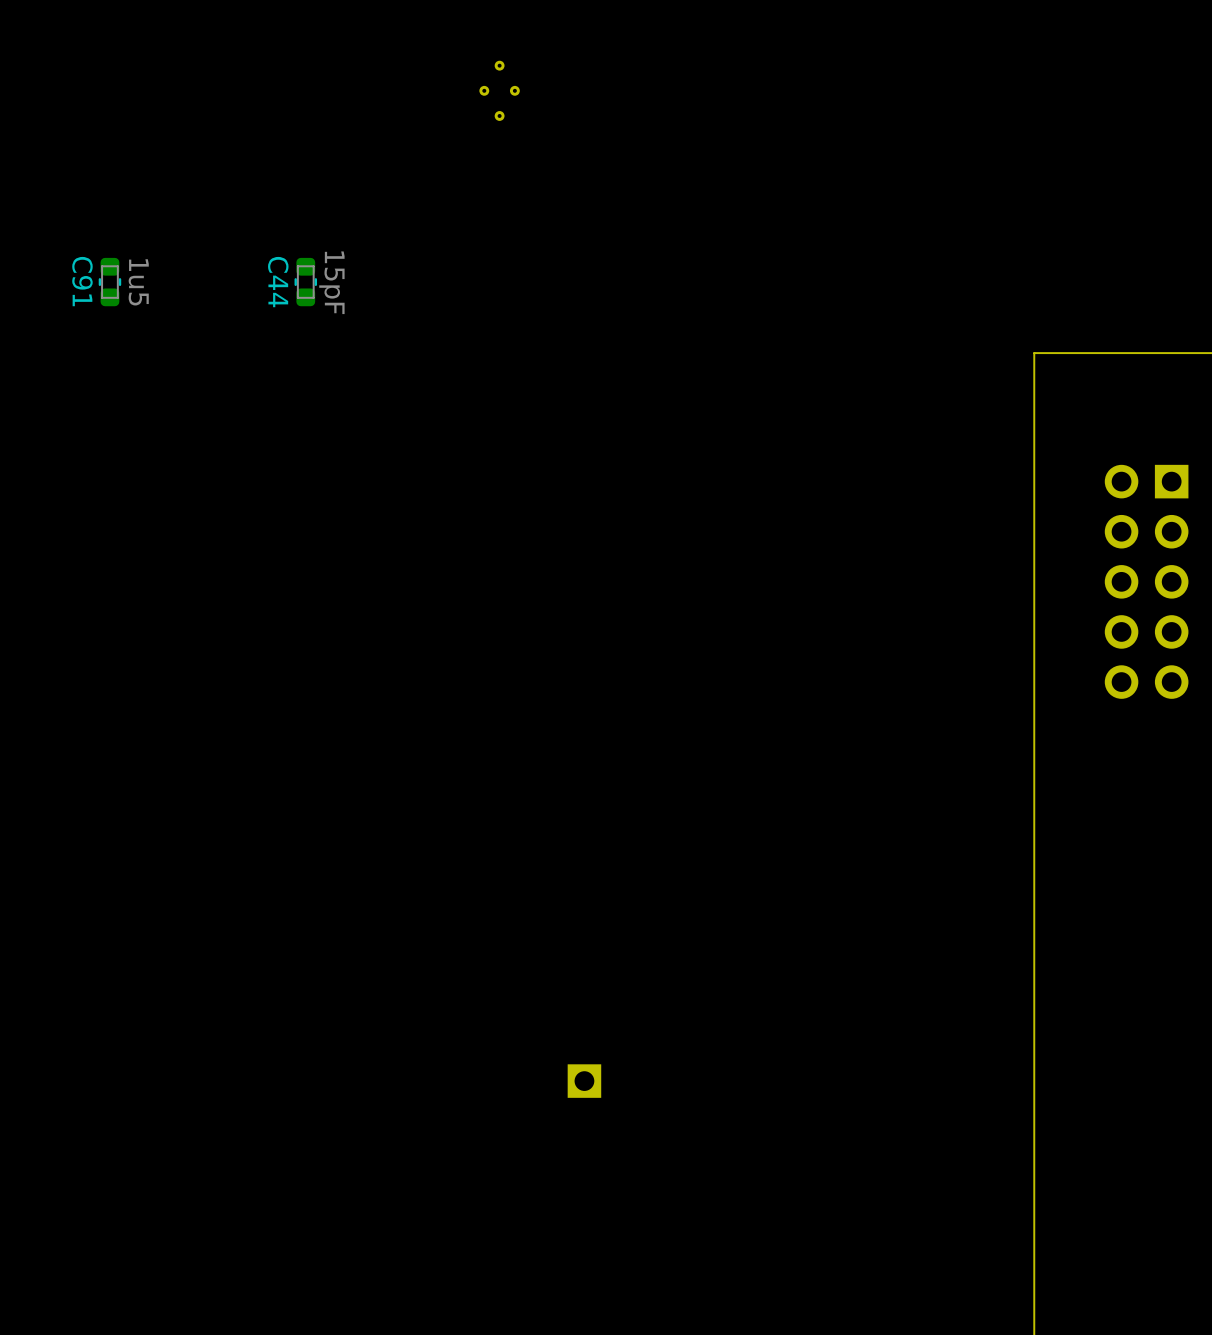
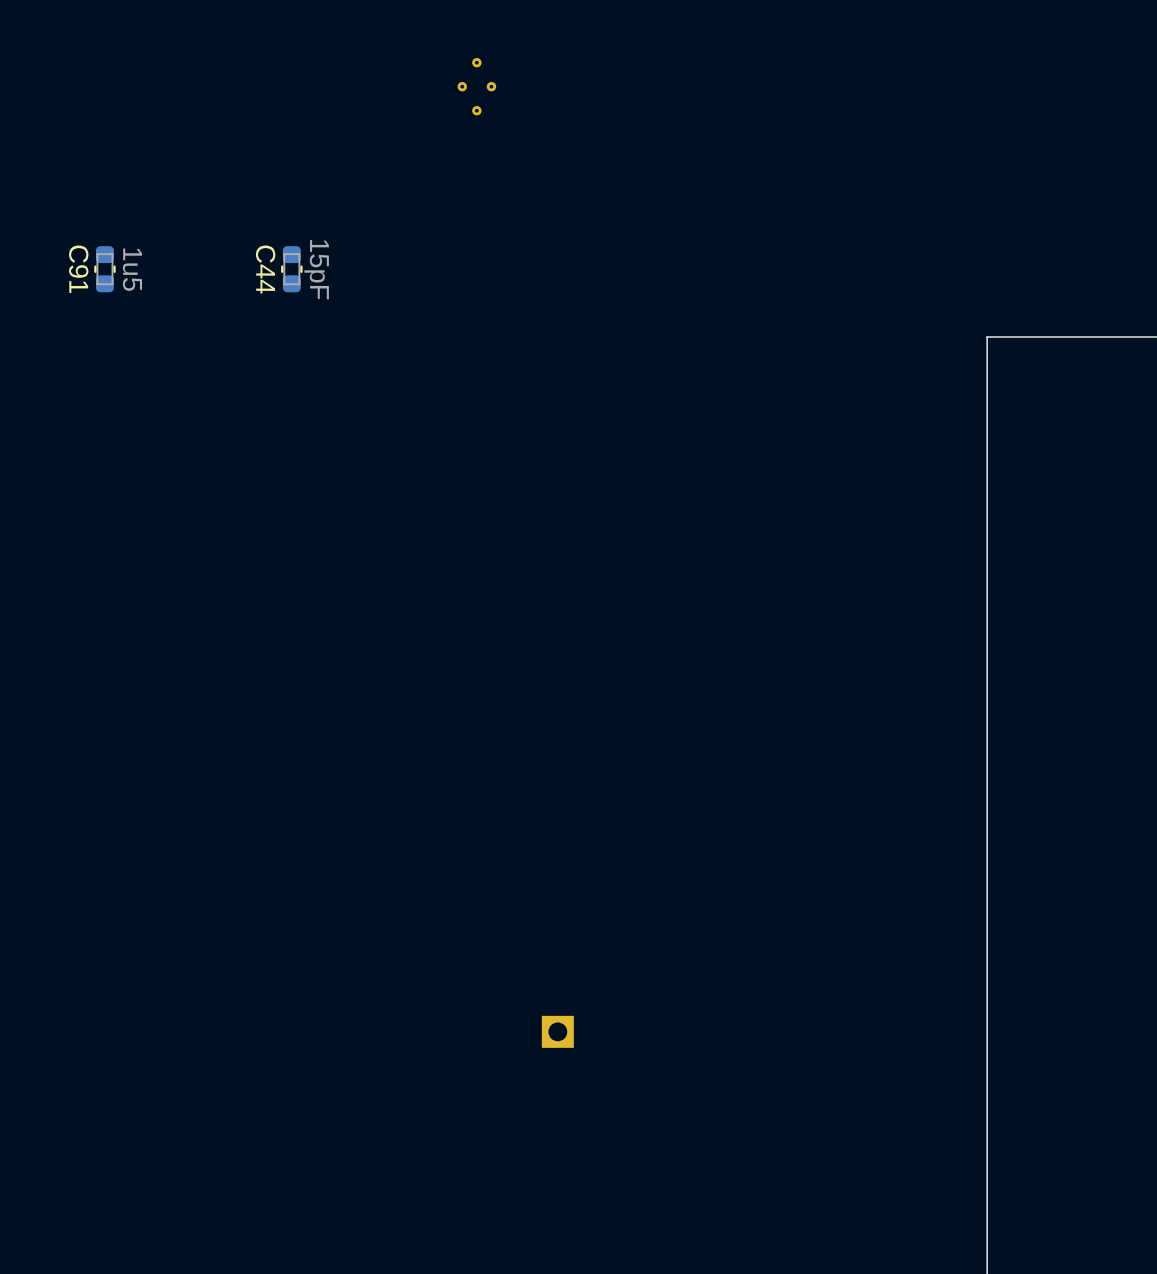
part: (1146, 581) -> none

